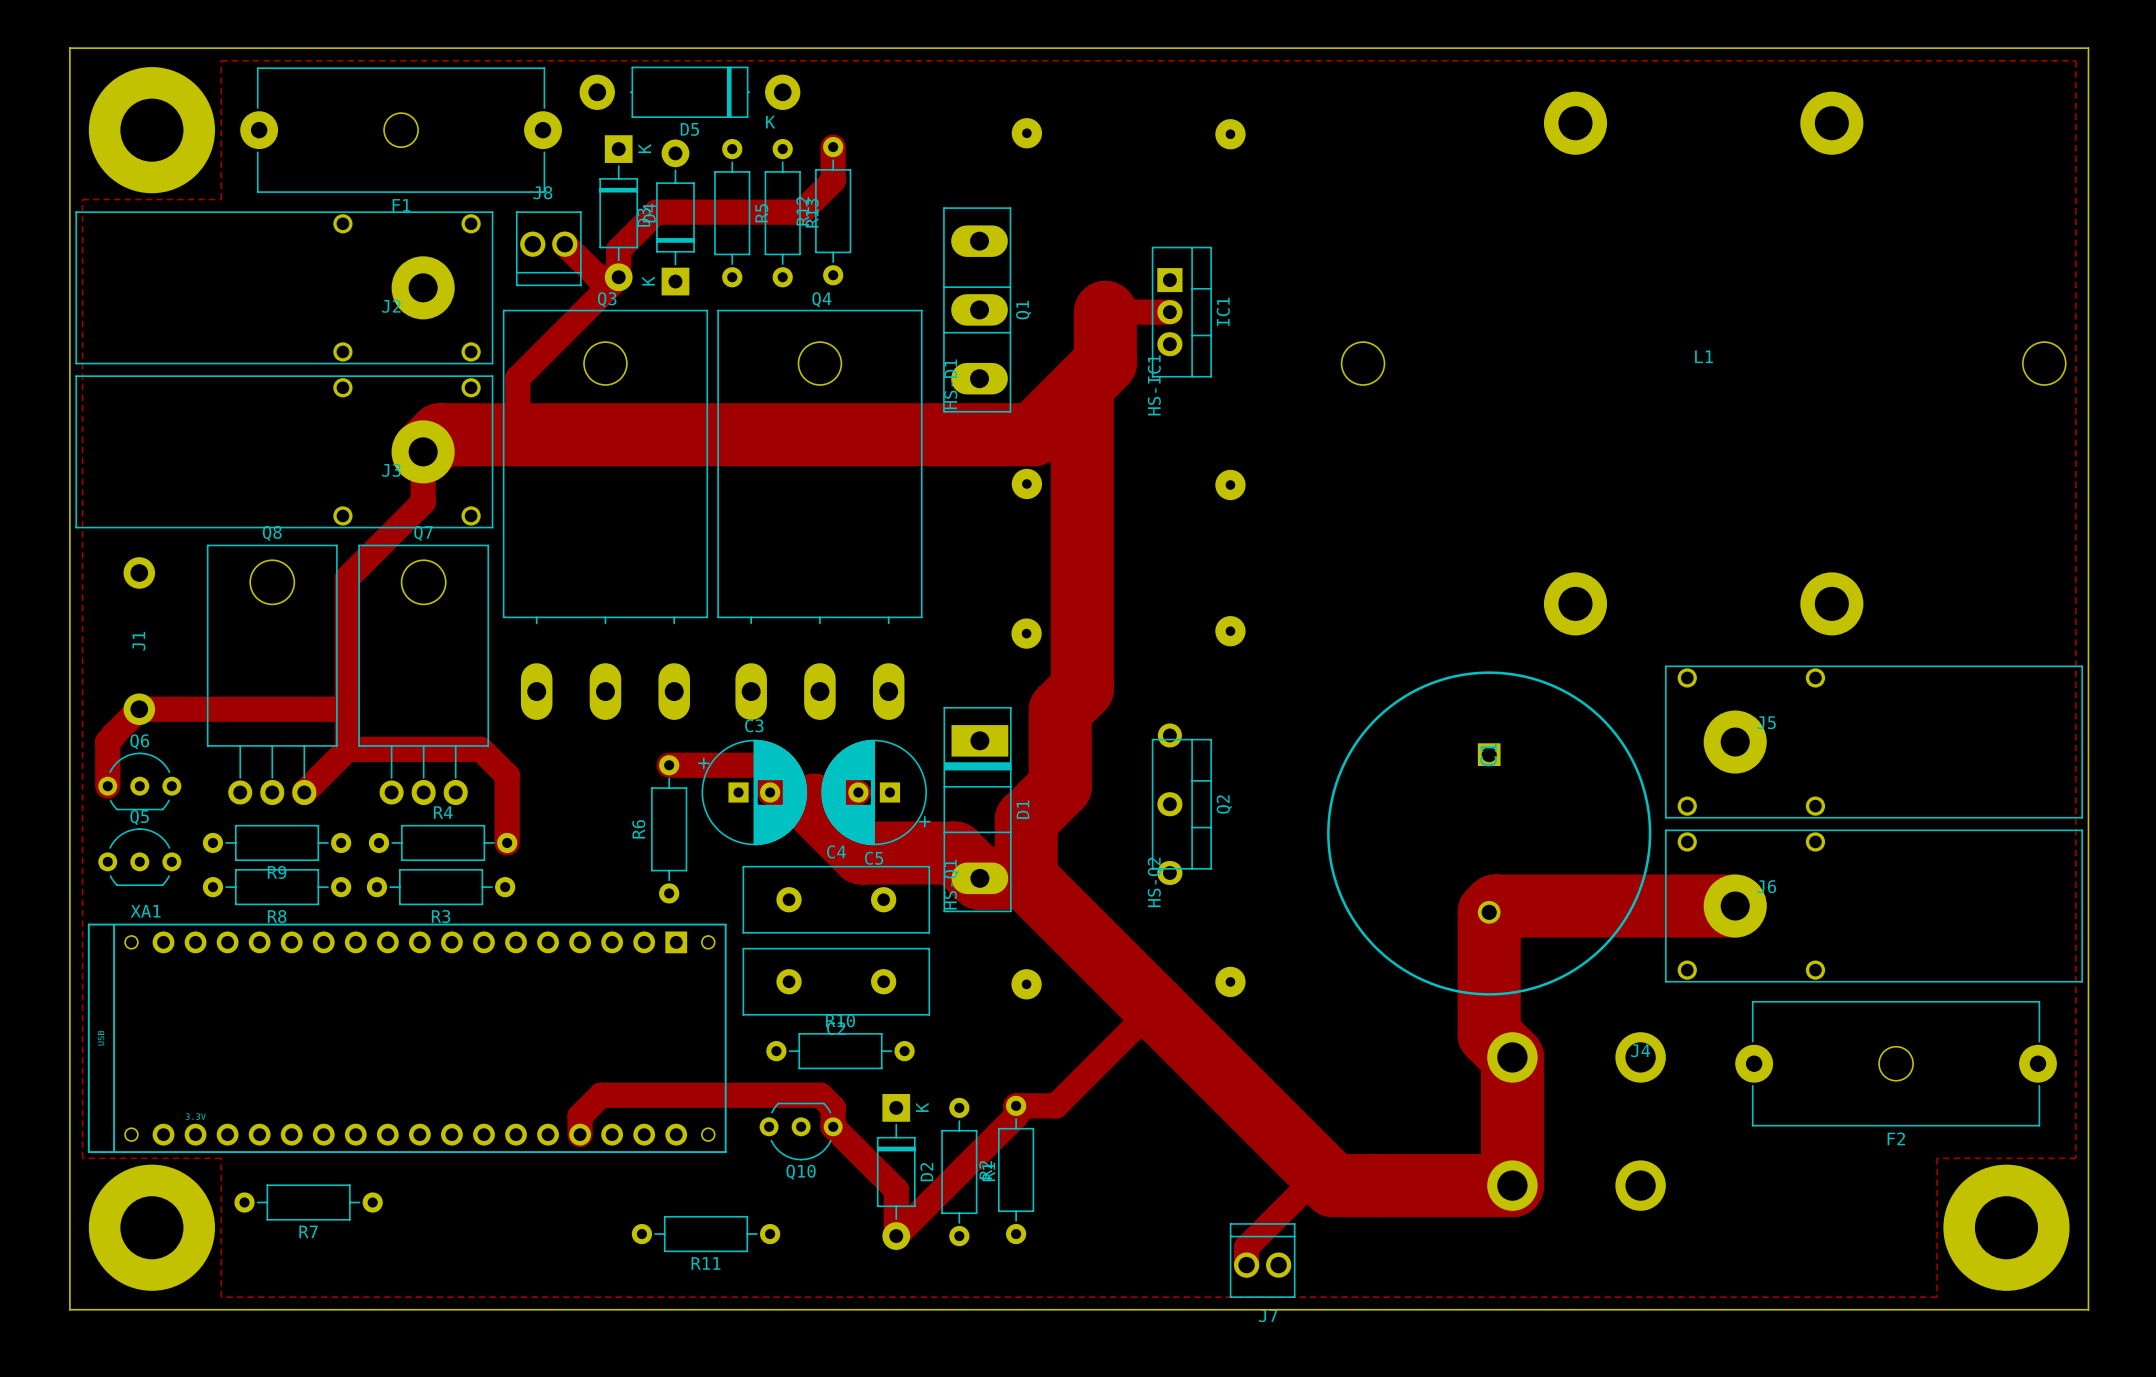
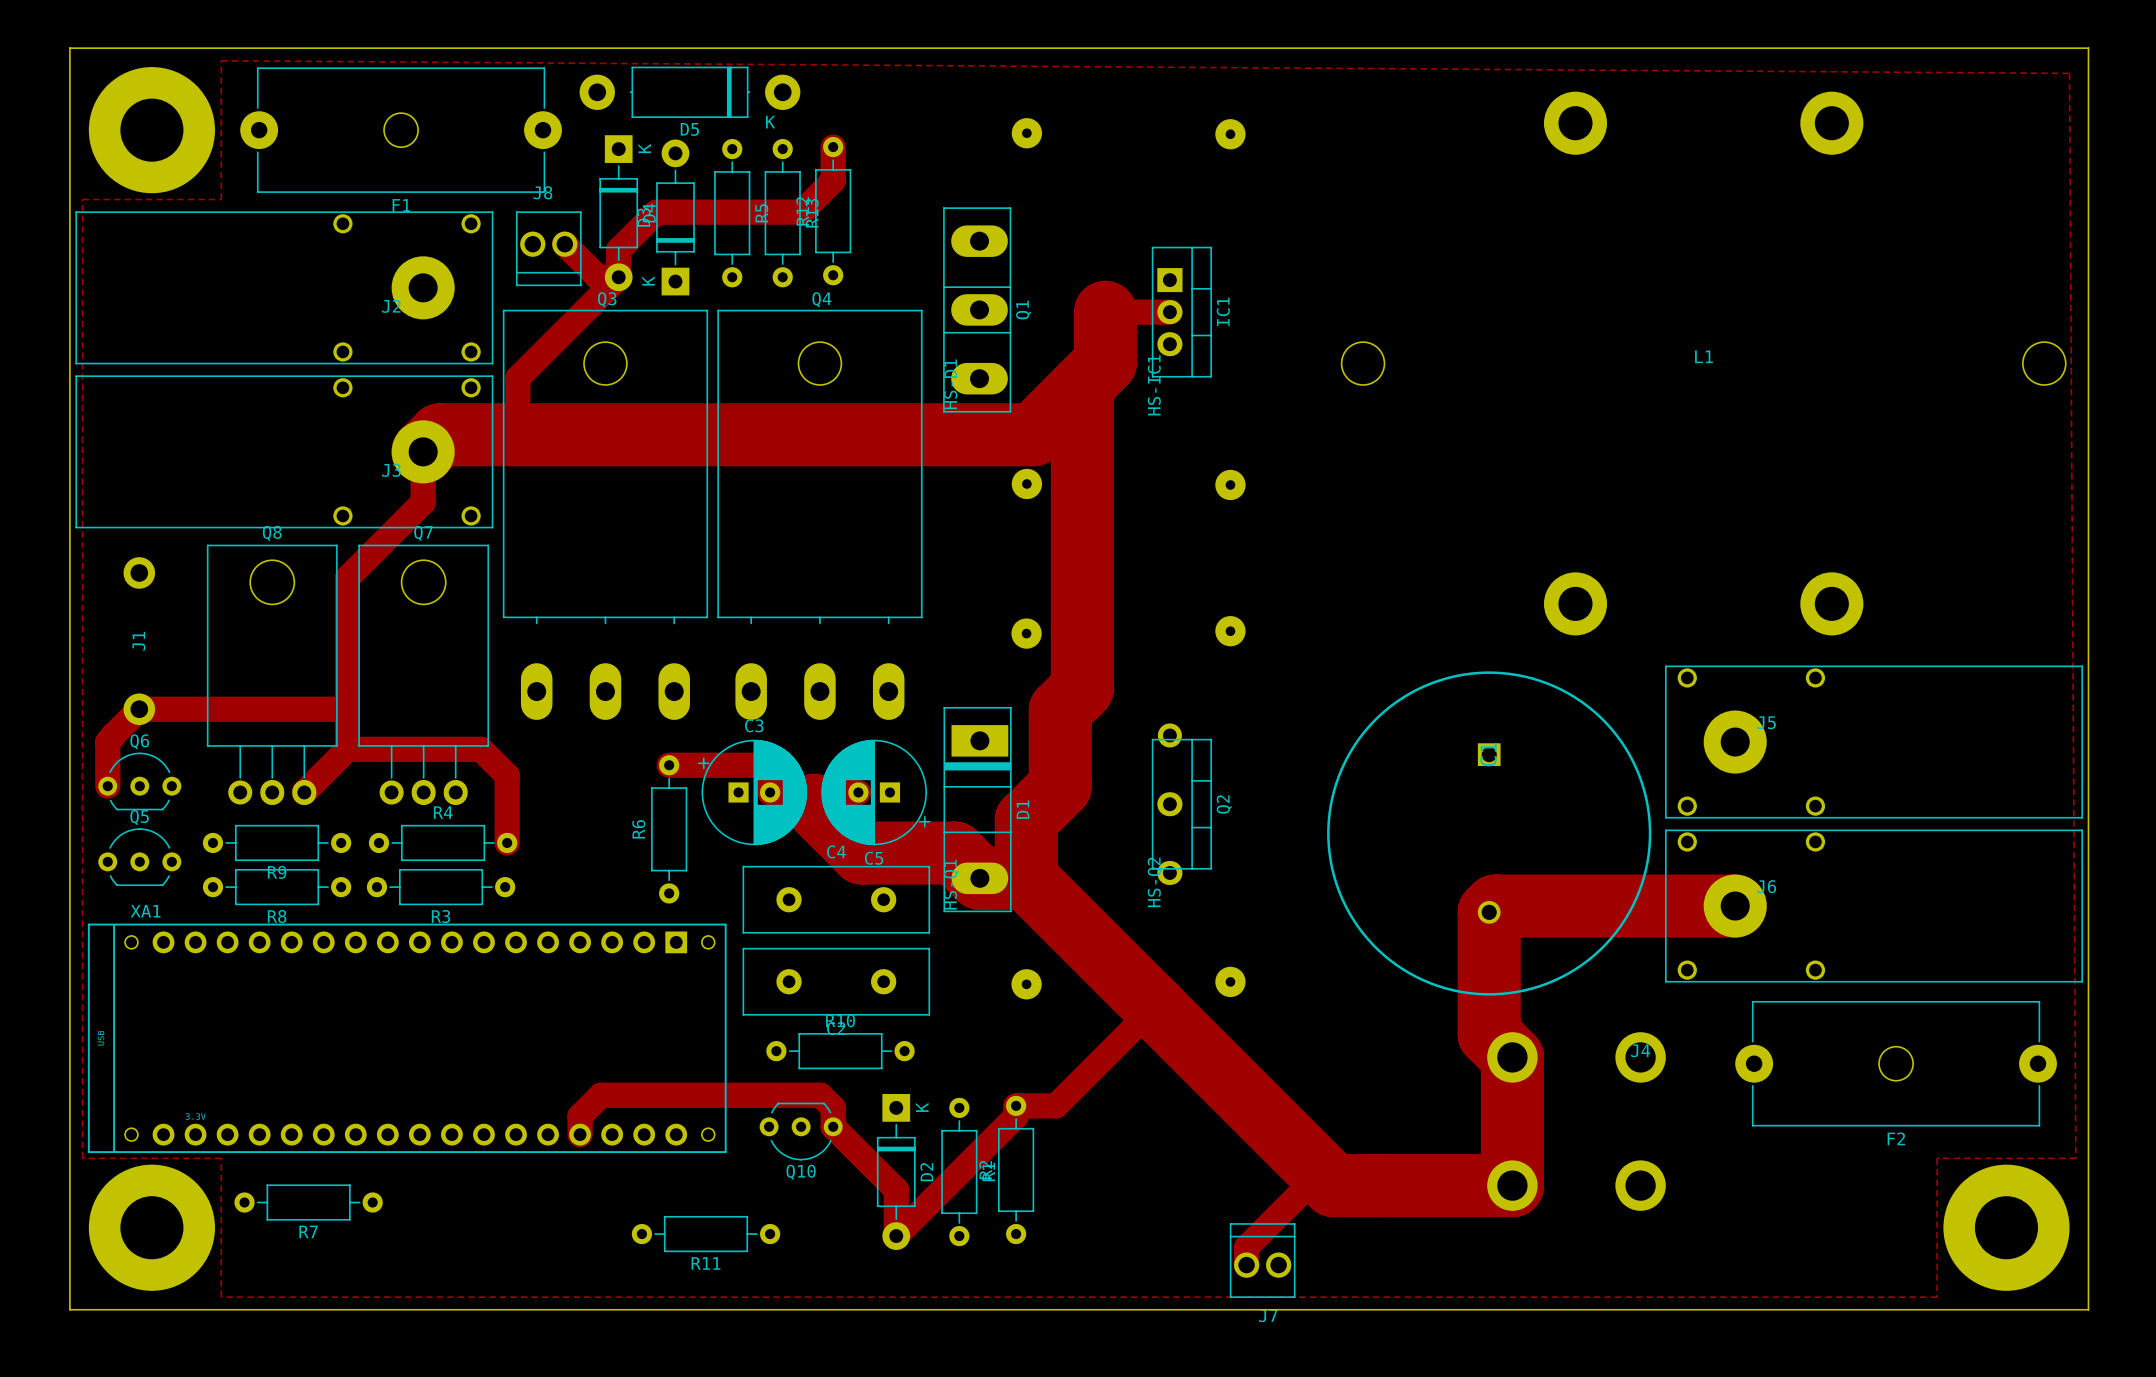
zone outline: (221, 60) (2075, 60) (2075, 1158) -> (221, 60) (2069, 73) (2075, 1158)

